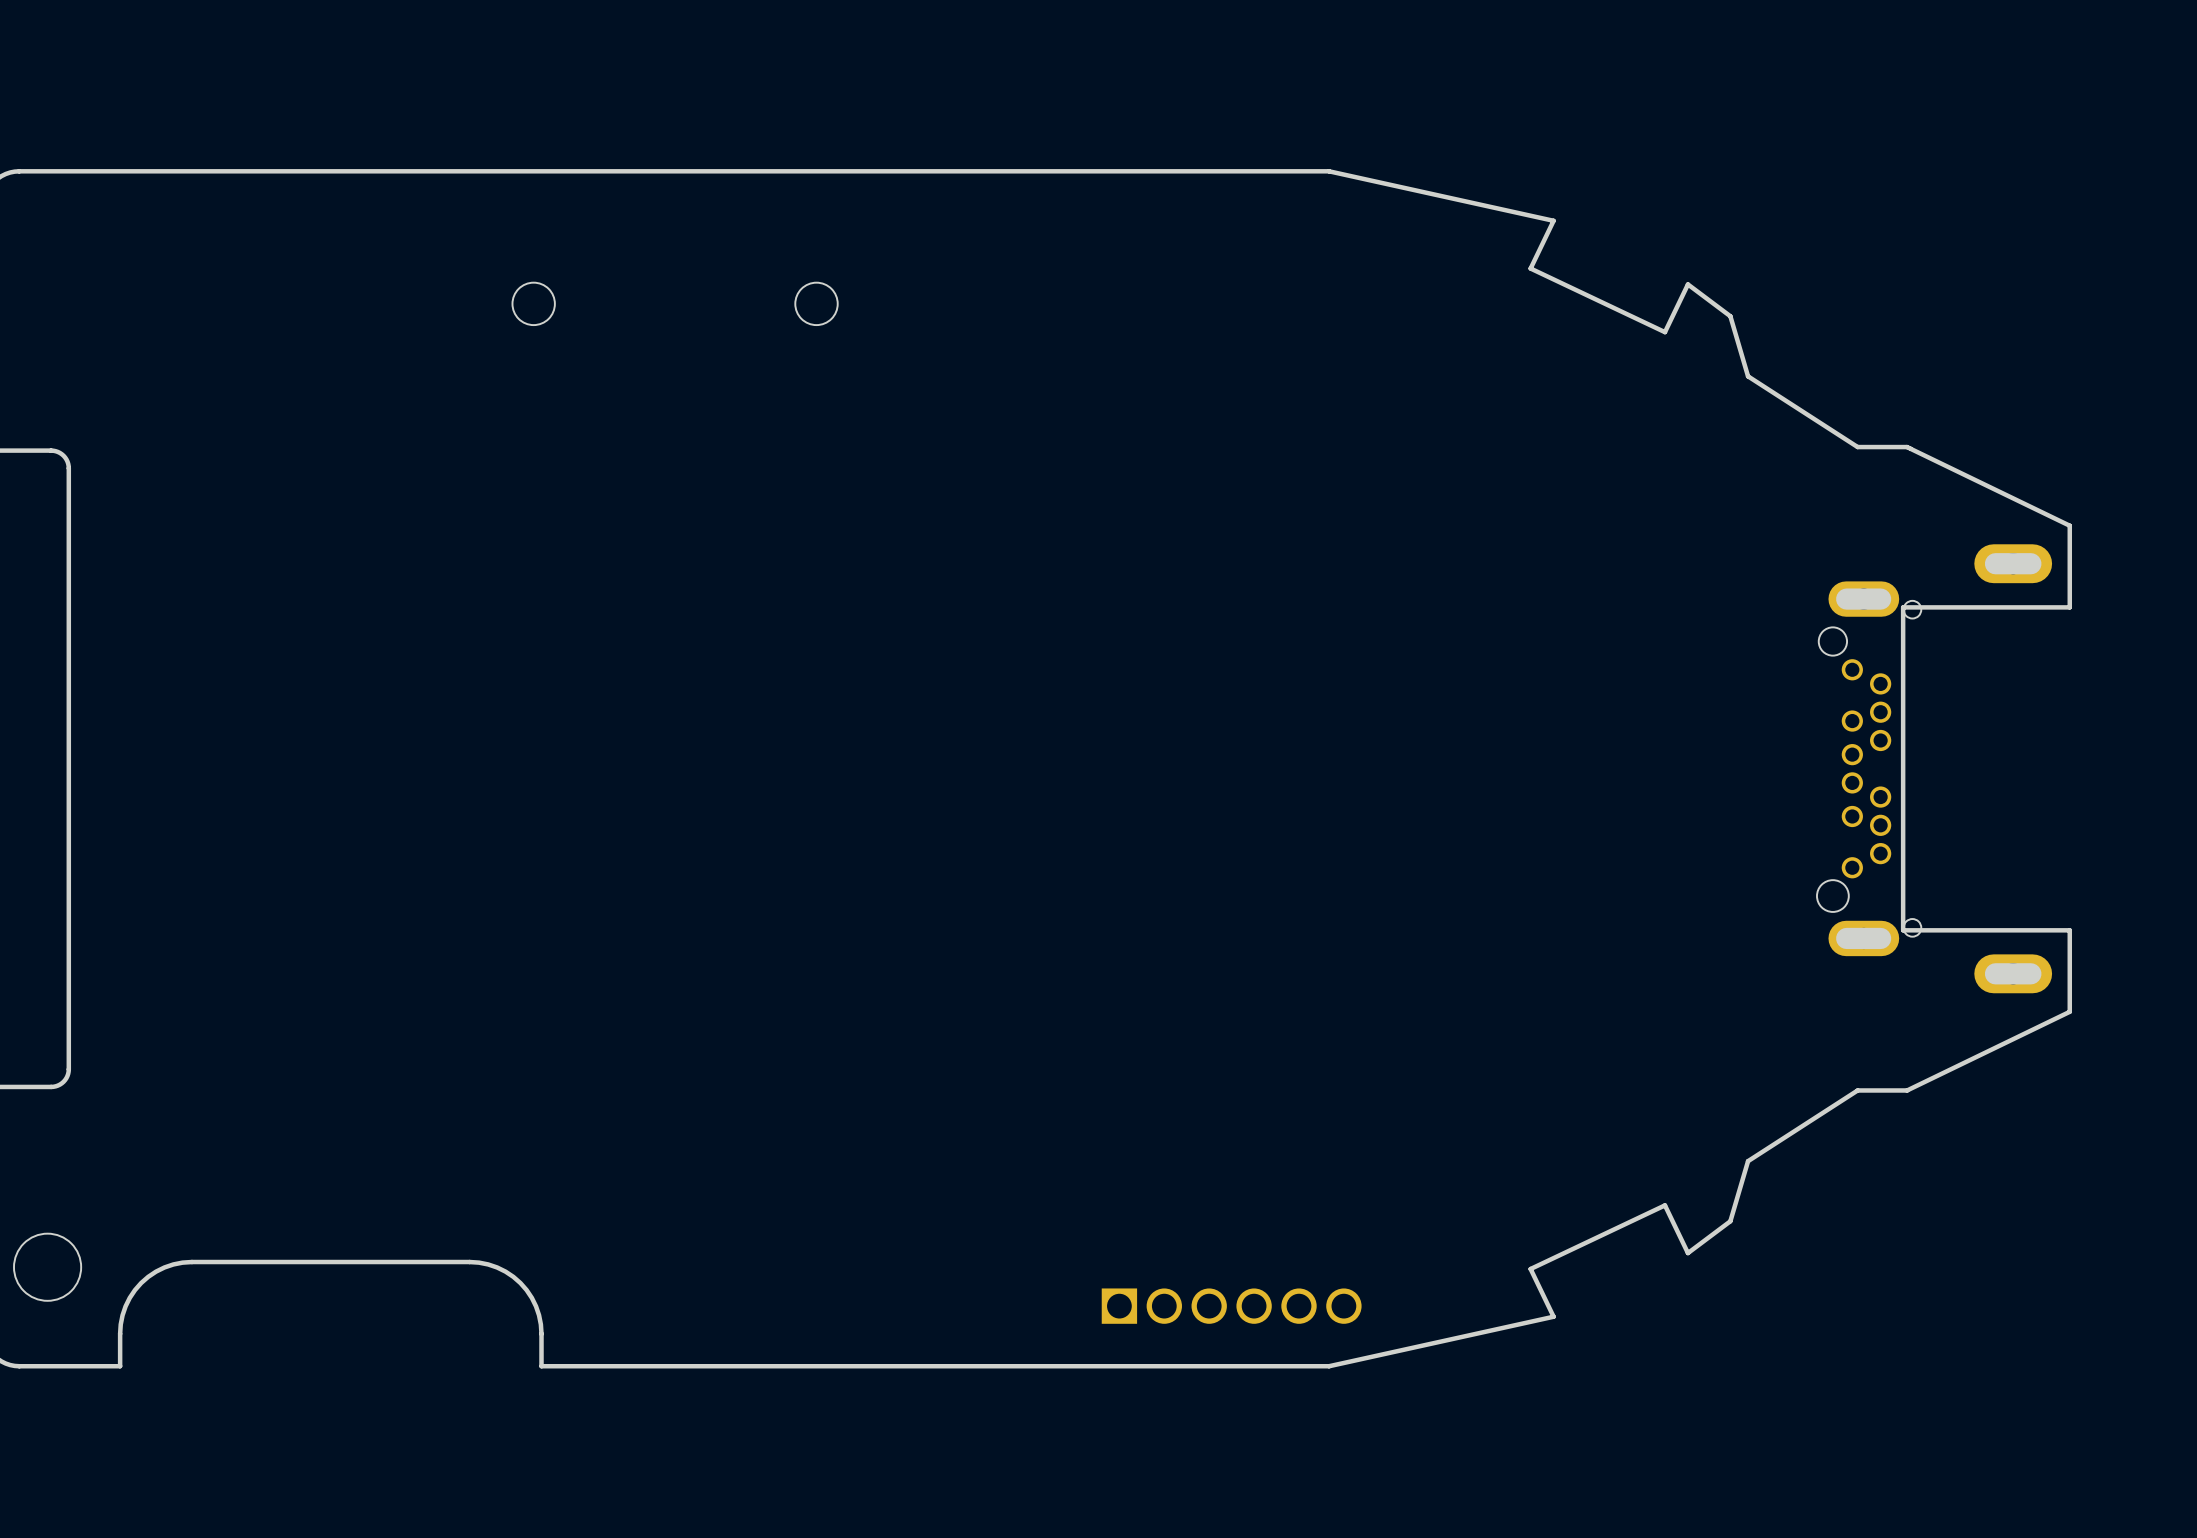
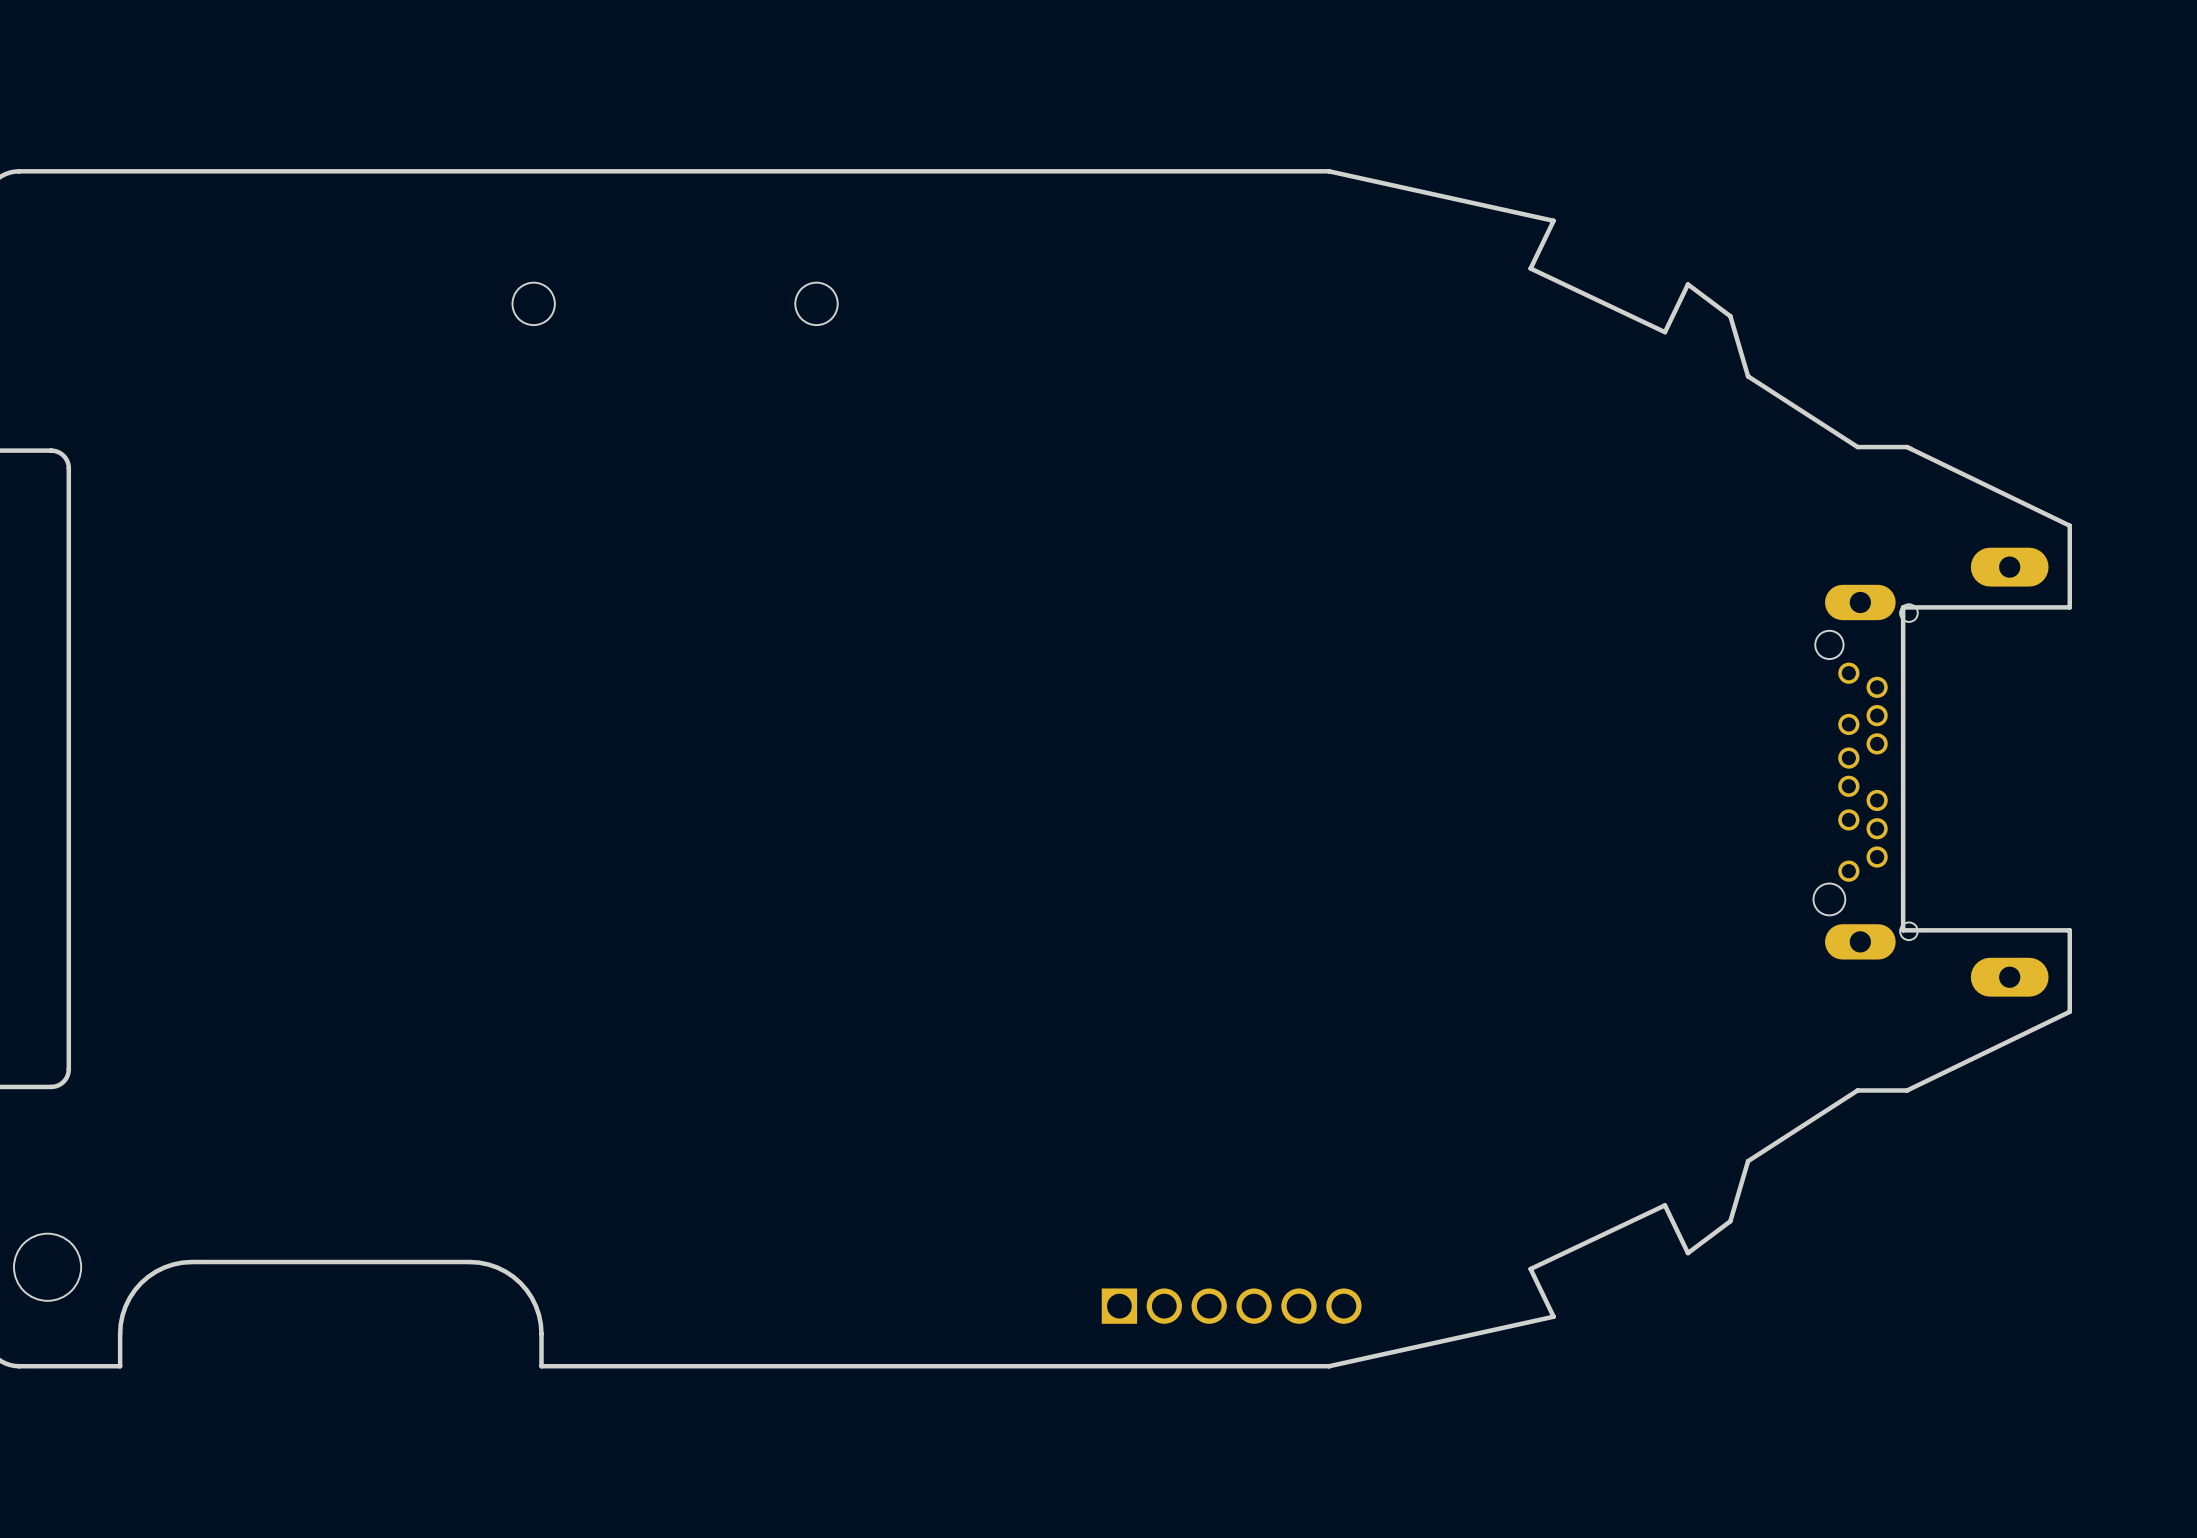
part footprint: [1816, 544, 2053, 994] -> [1813, 547, 2049, 997]

